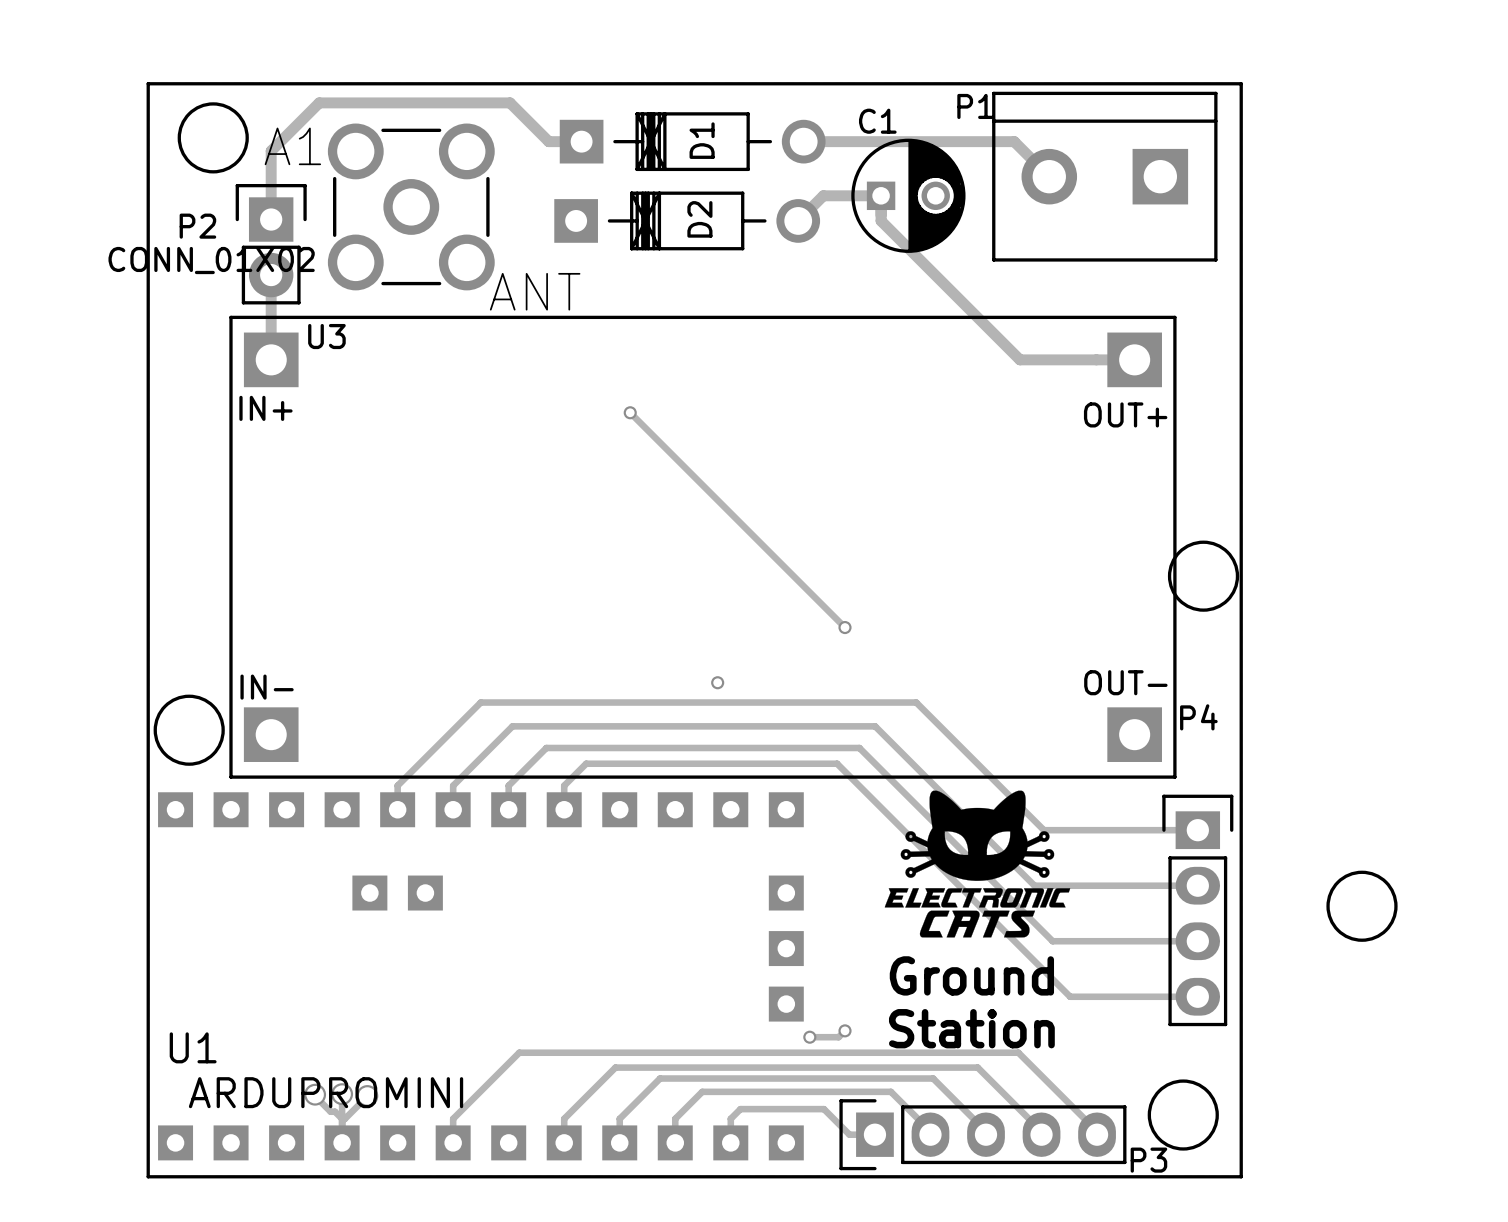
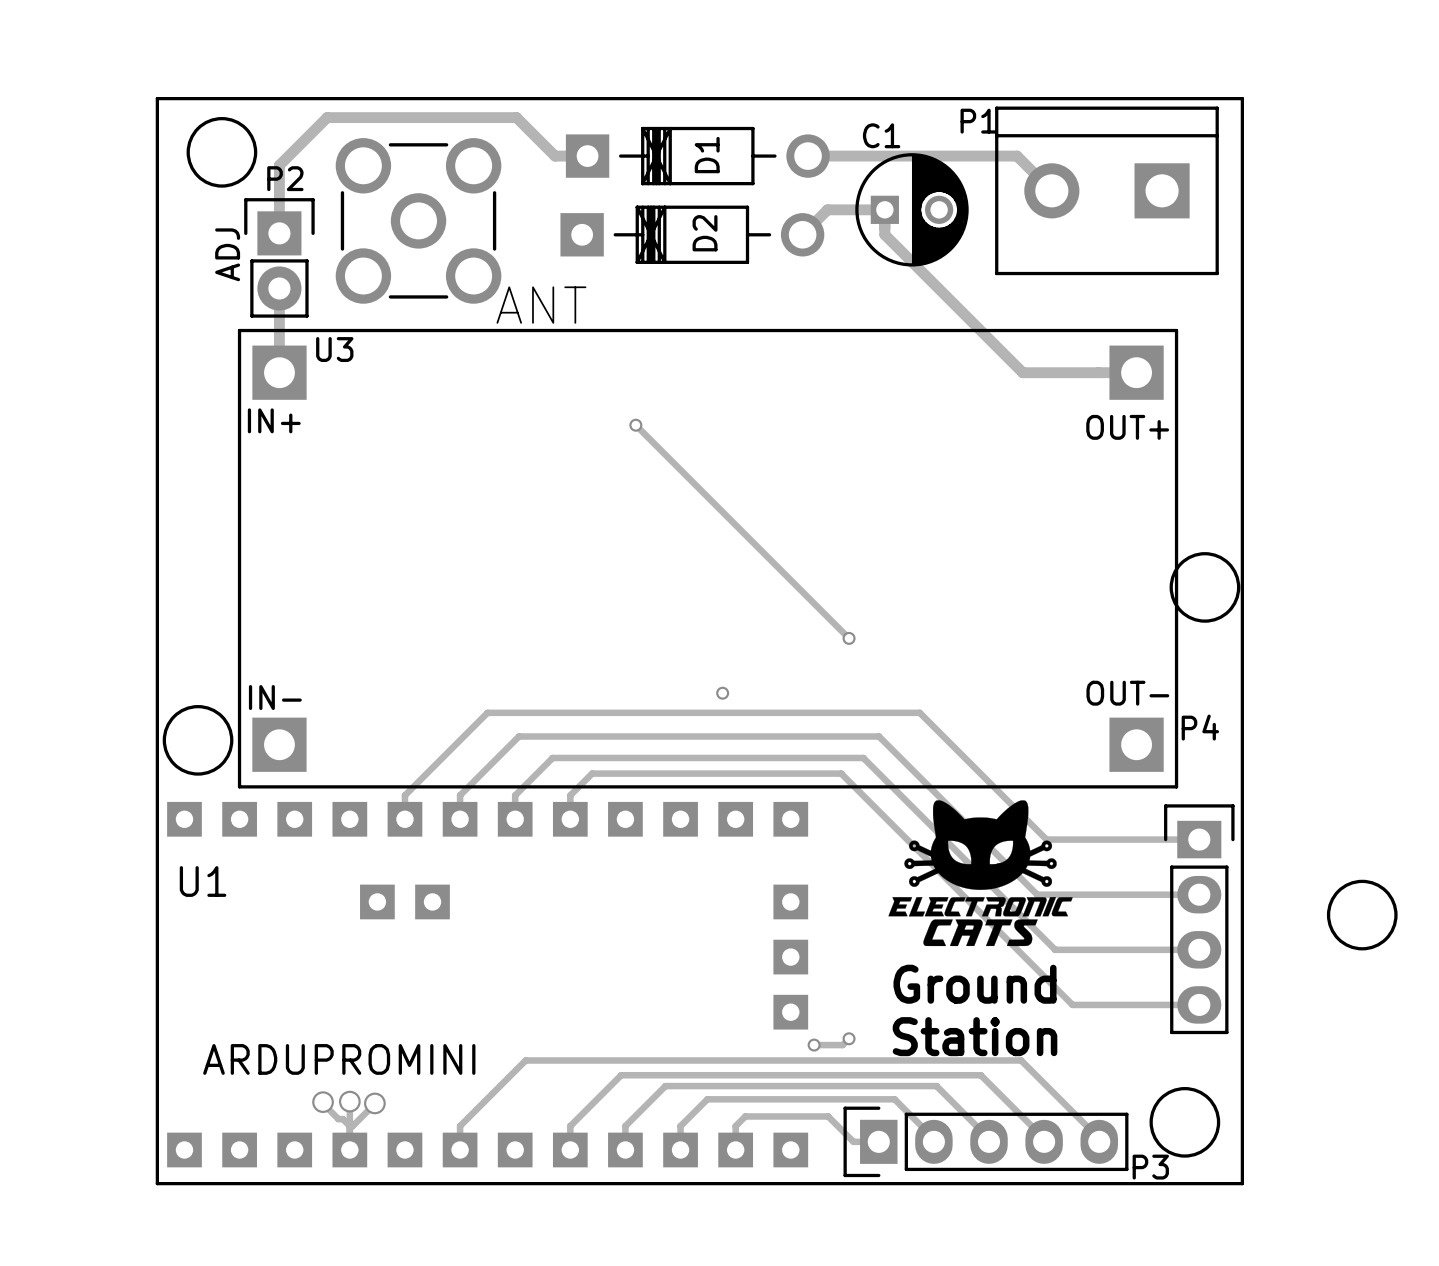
A1 name: A1 (292, 146) -> none
P2 name position: P2 (197, 226) -> P2 (285, 178)
P2 value: CONN_01X02 (211, 260) -> ADJ (227, 254)
U1 name position: U1 (193, 1047) -> U1 (203, 881)
U1 value position: ARDUPROMINI (326, 1092) -> ARDUPROMINI (339, 1059)

